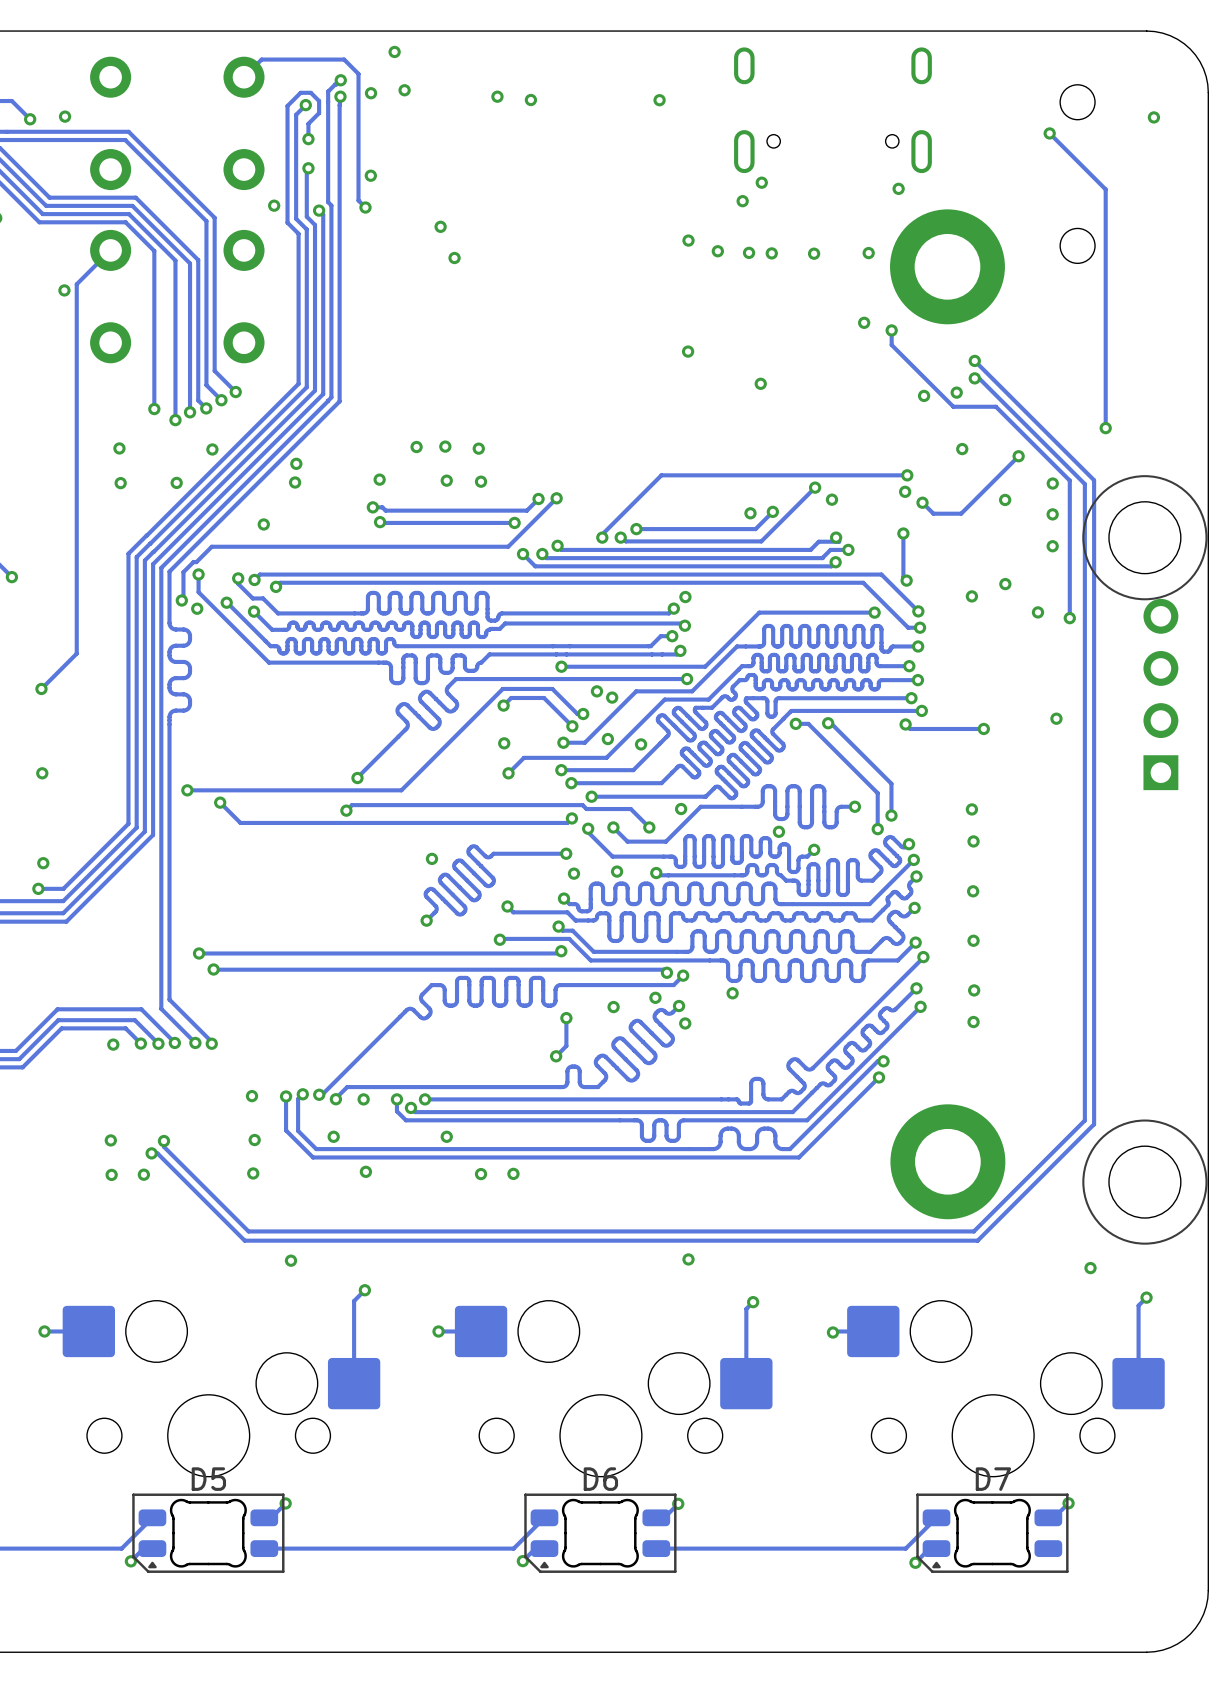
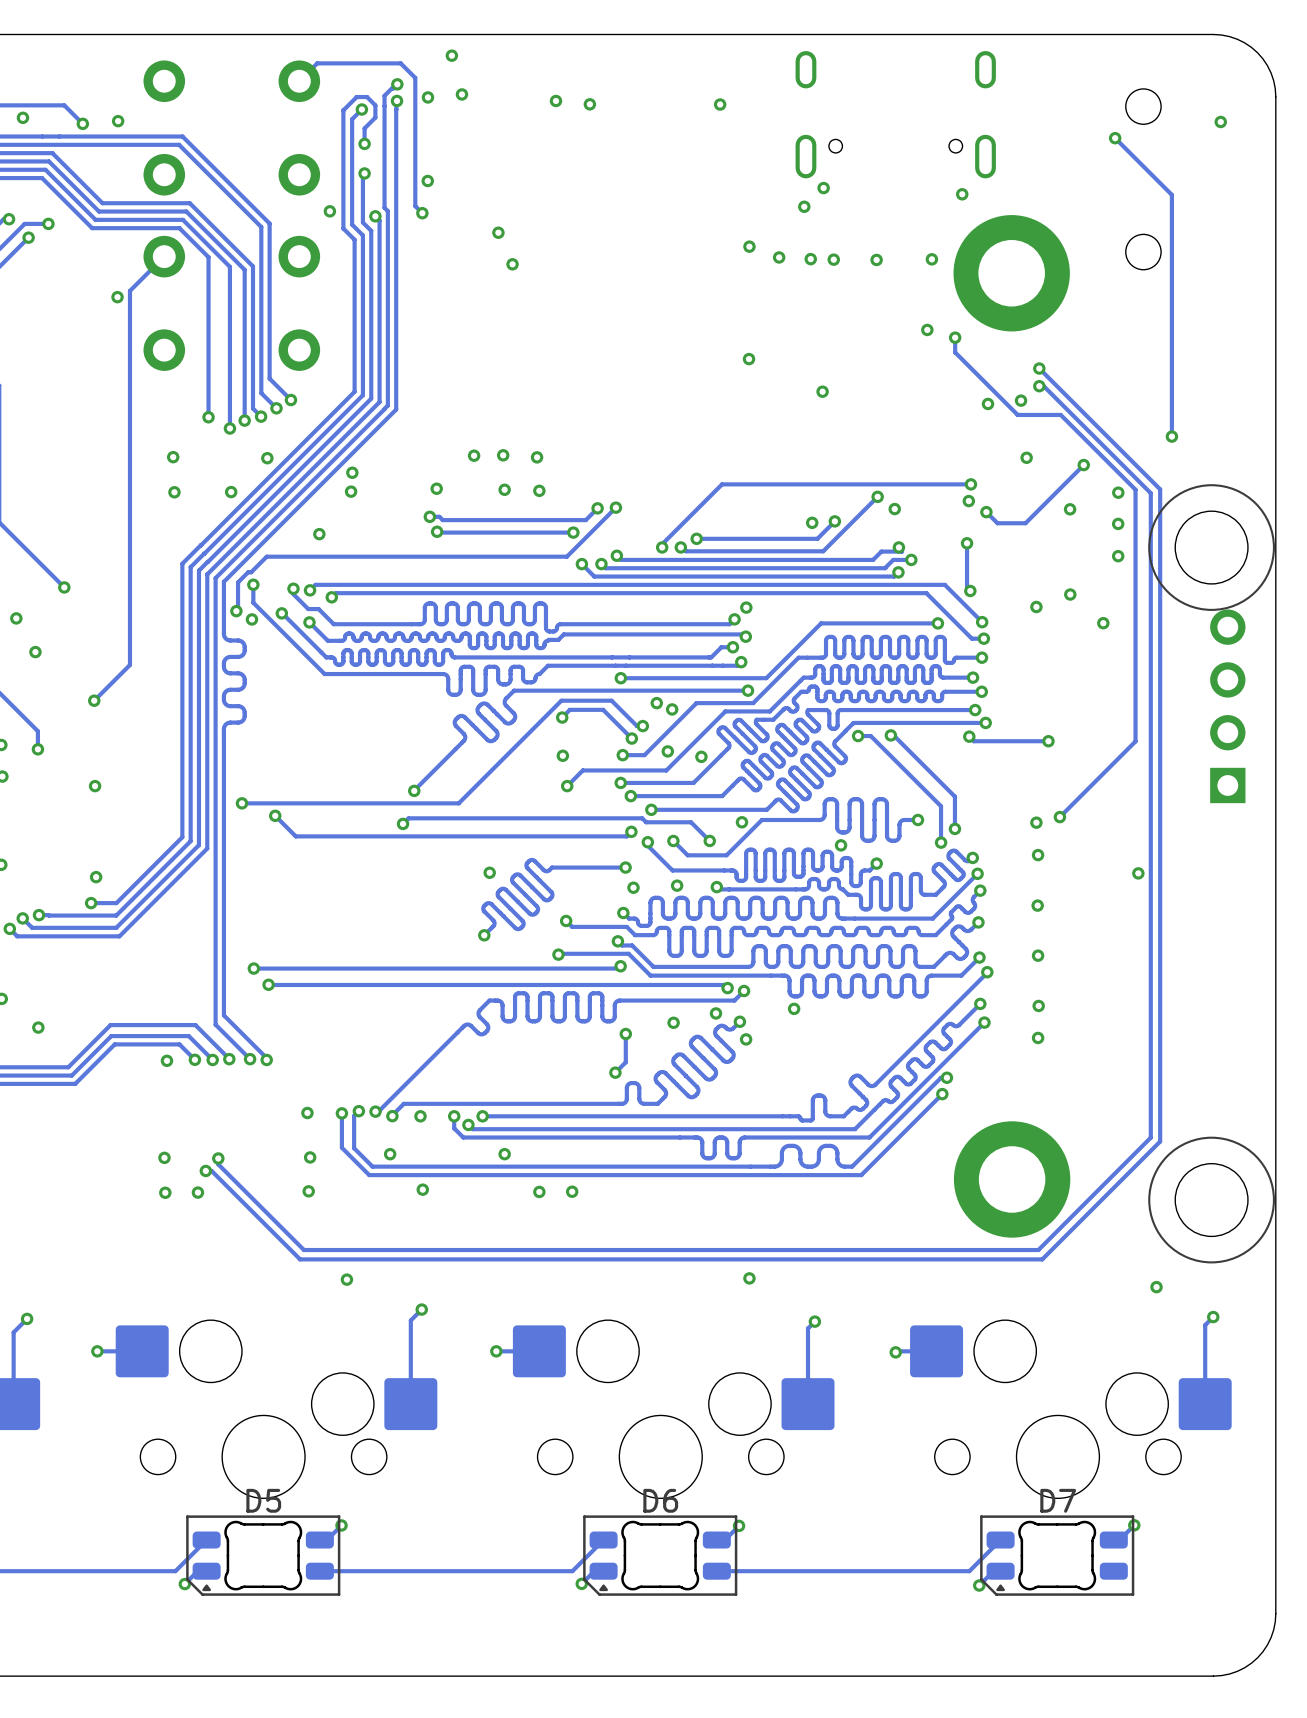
track: none -> (1135, 629) (1135, 741) (1059, 817)
via: (1069, 618) -> none
via: (1056, 718) -> none
via: none -> (1059, 817)
via: none -> (1138, 873)

